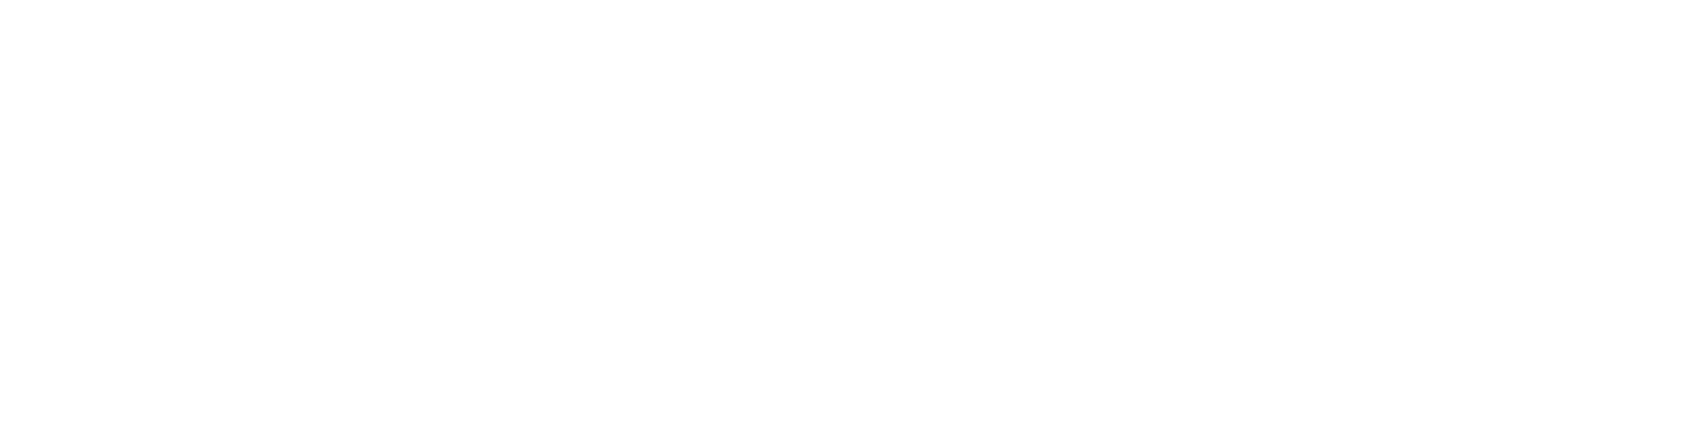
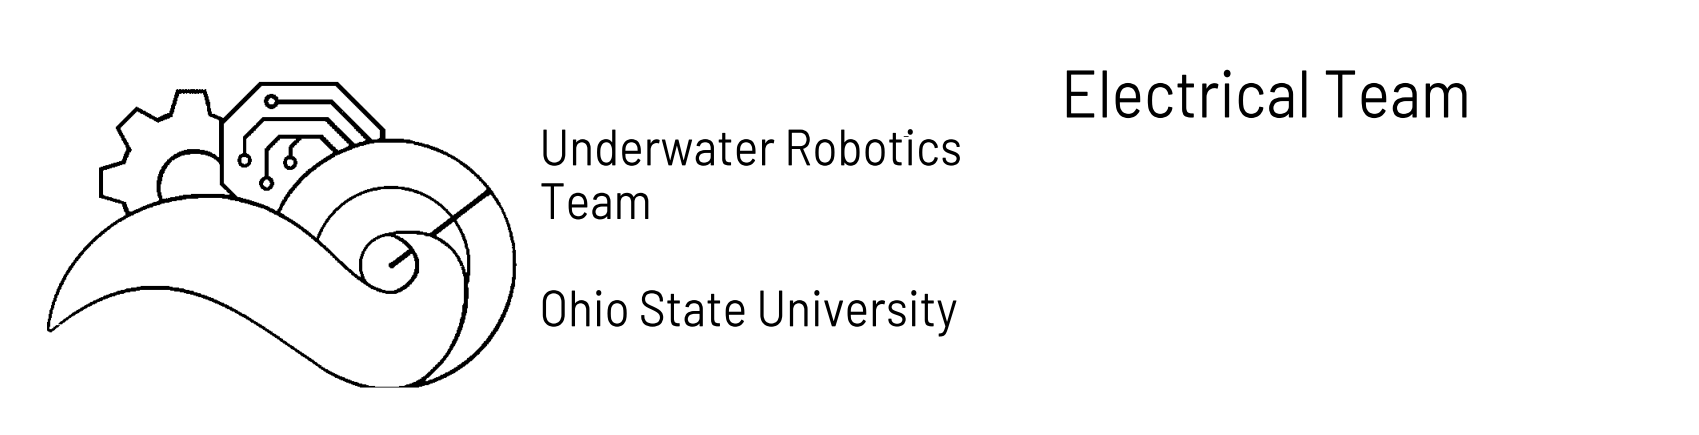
drawing: none -> [47, 81, 517, 388]
text: none -> Electrical Team (1266, 93)
drawing: none -> [903, 136, 909, 137]
text: none -> Underwater Robotics (751, 147)
text: none -> Team (594, 201)
text: none -> Ohio State University (749, 313)

